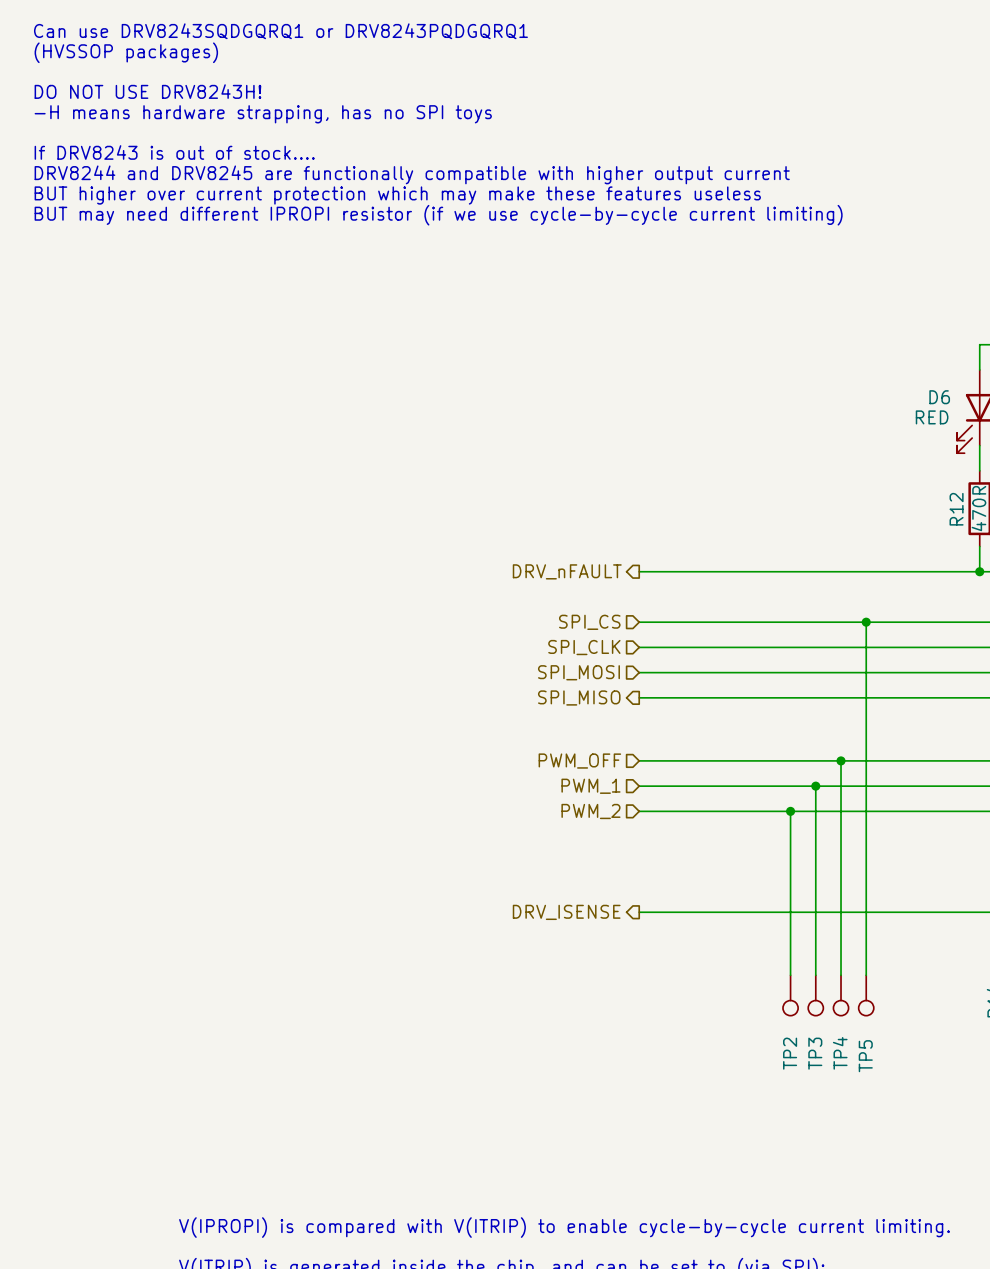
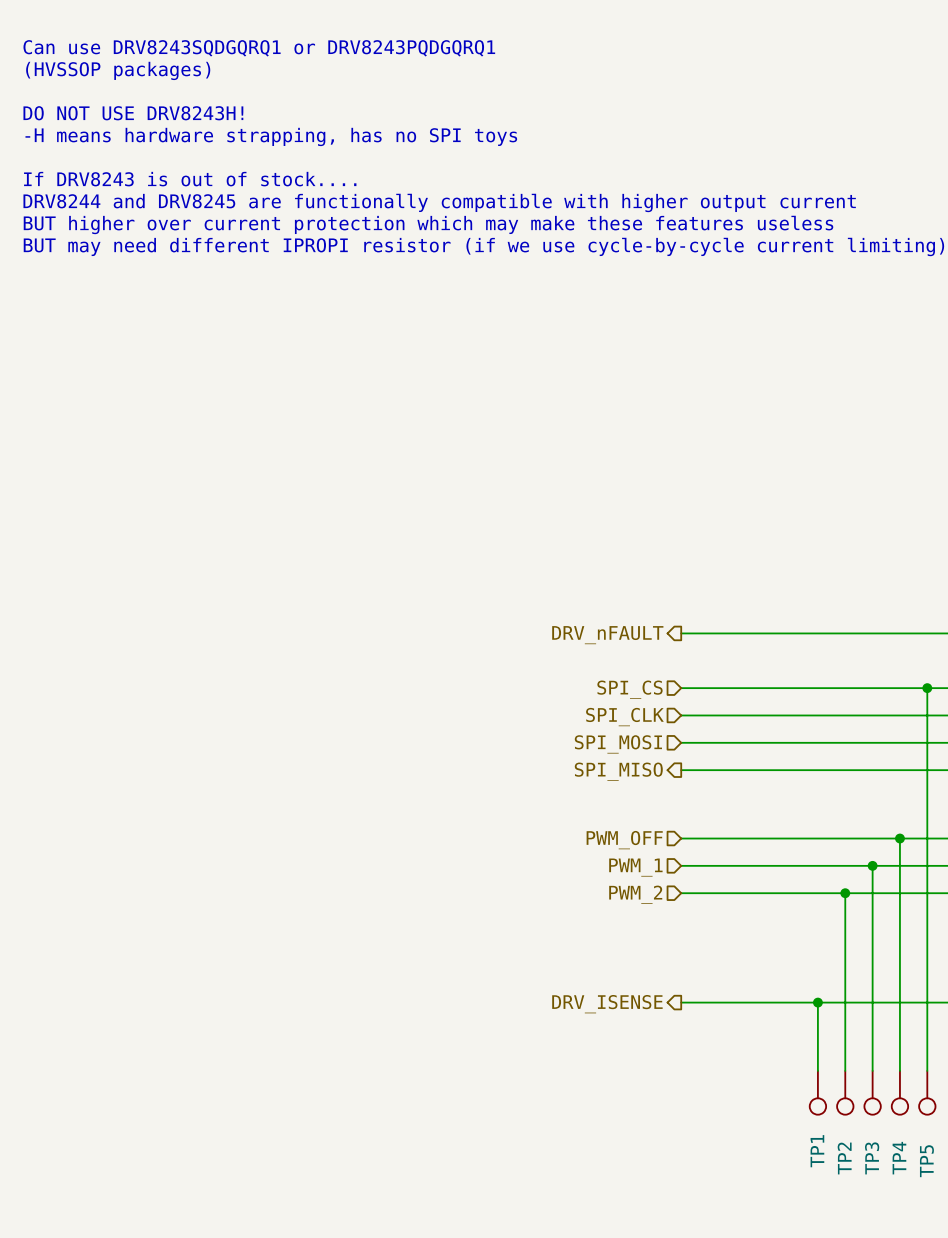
wire: none -> (817, 1002) (817, 1070)
junction: none -> (817, 1002)
TP1: none -> (817, 1092)

